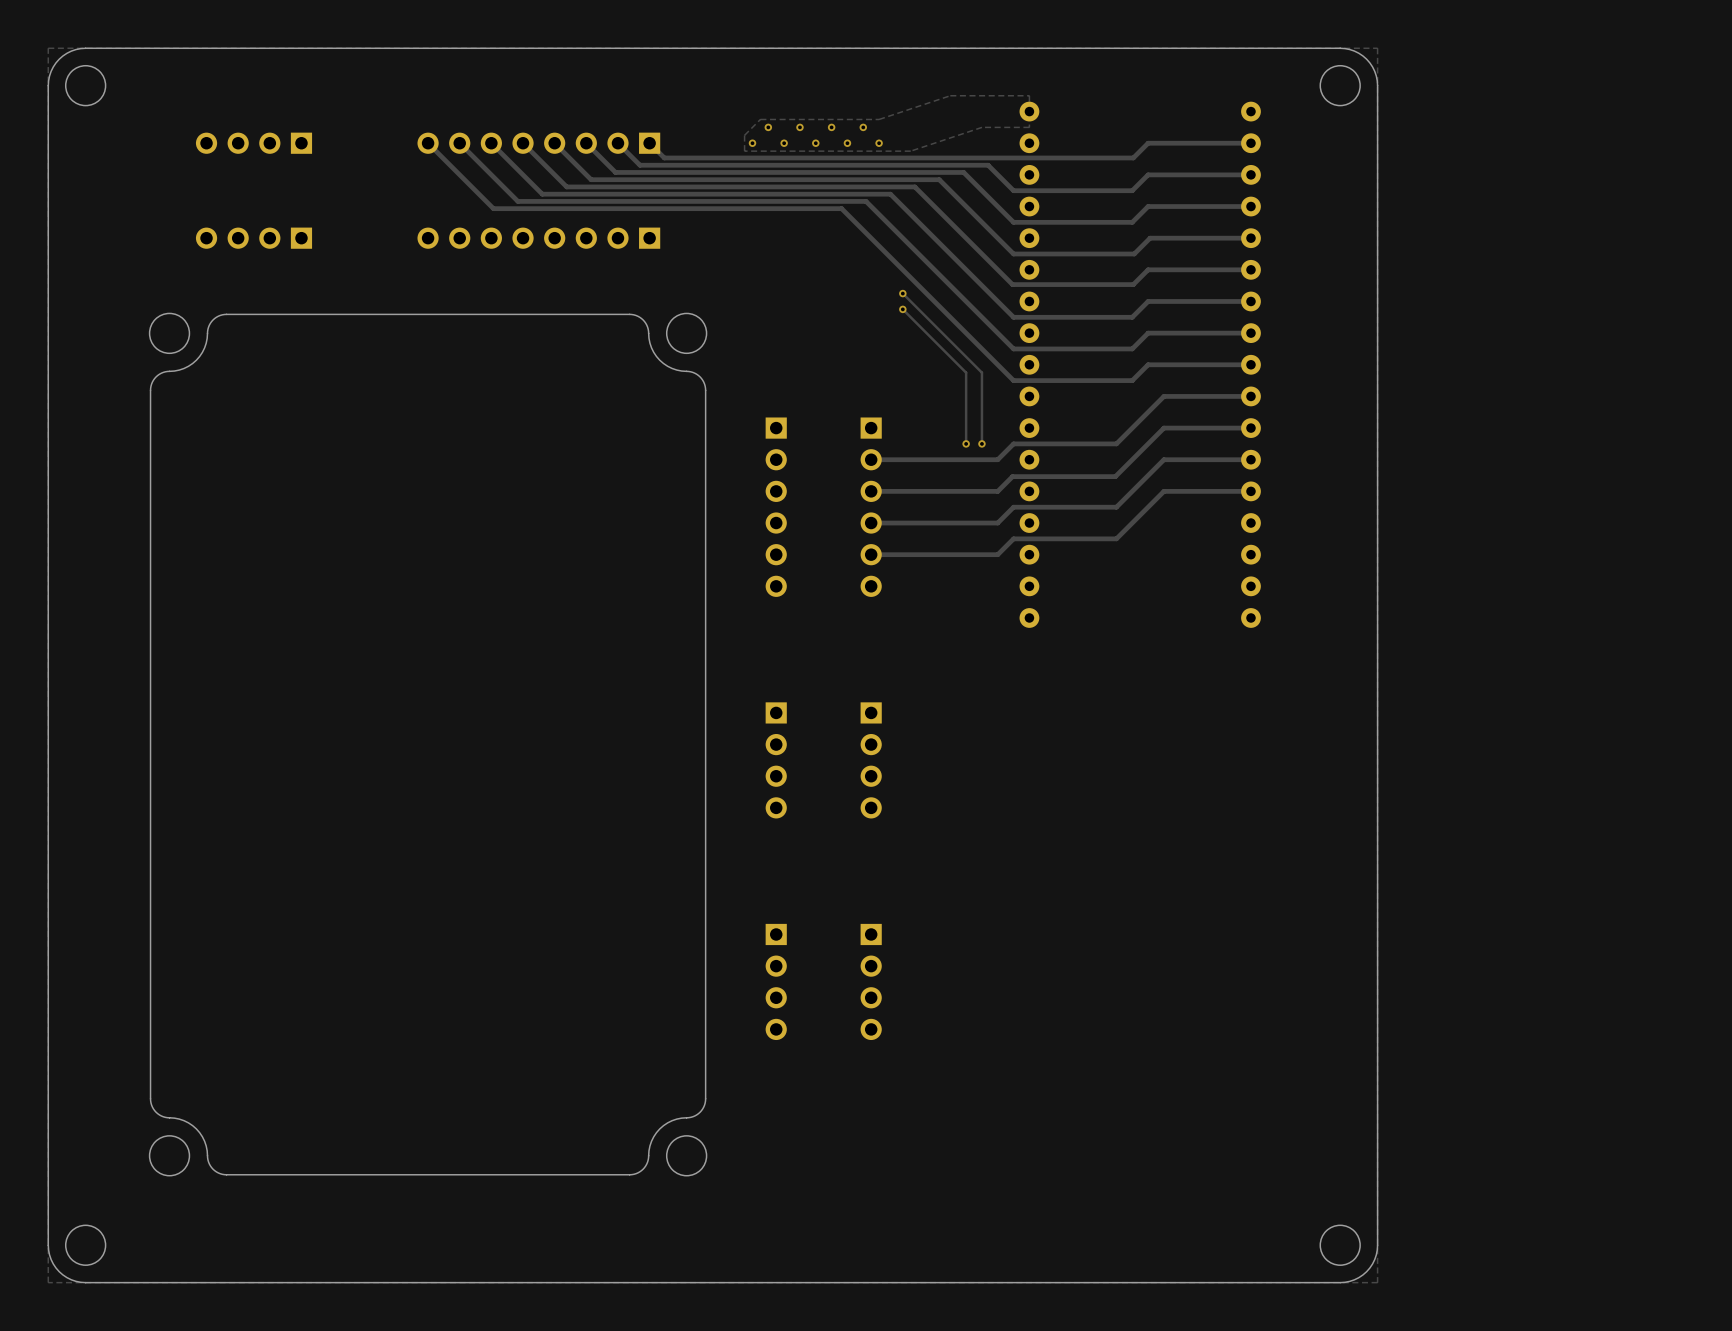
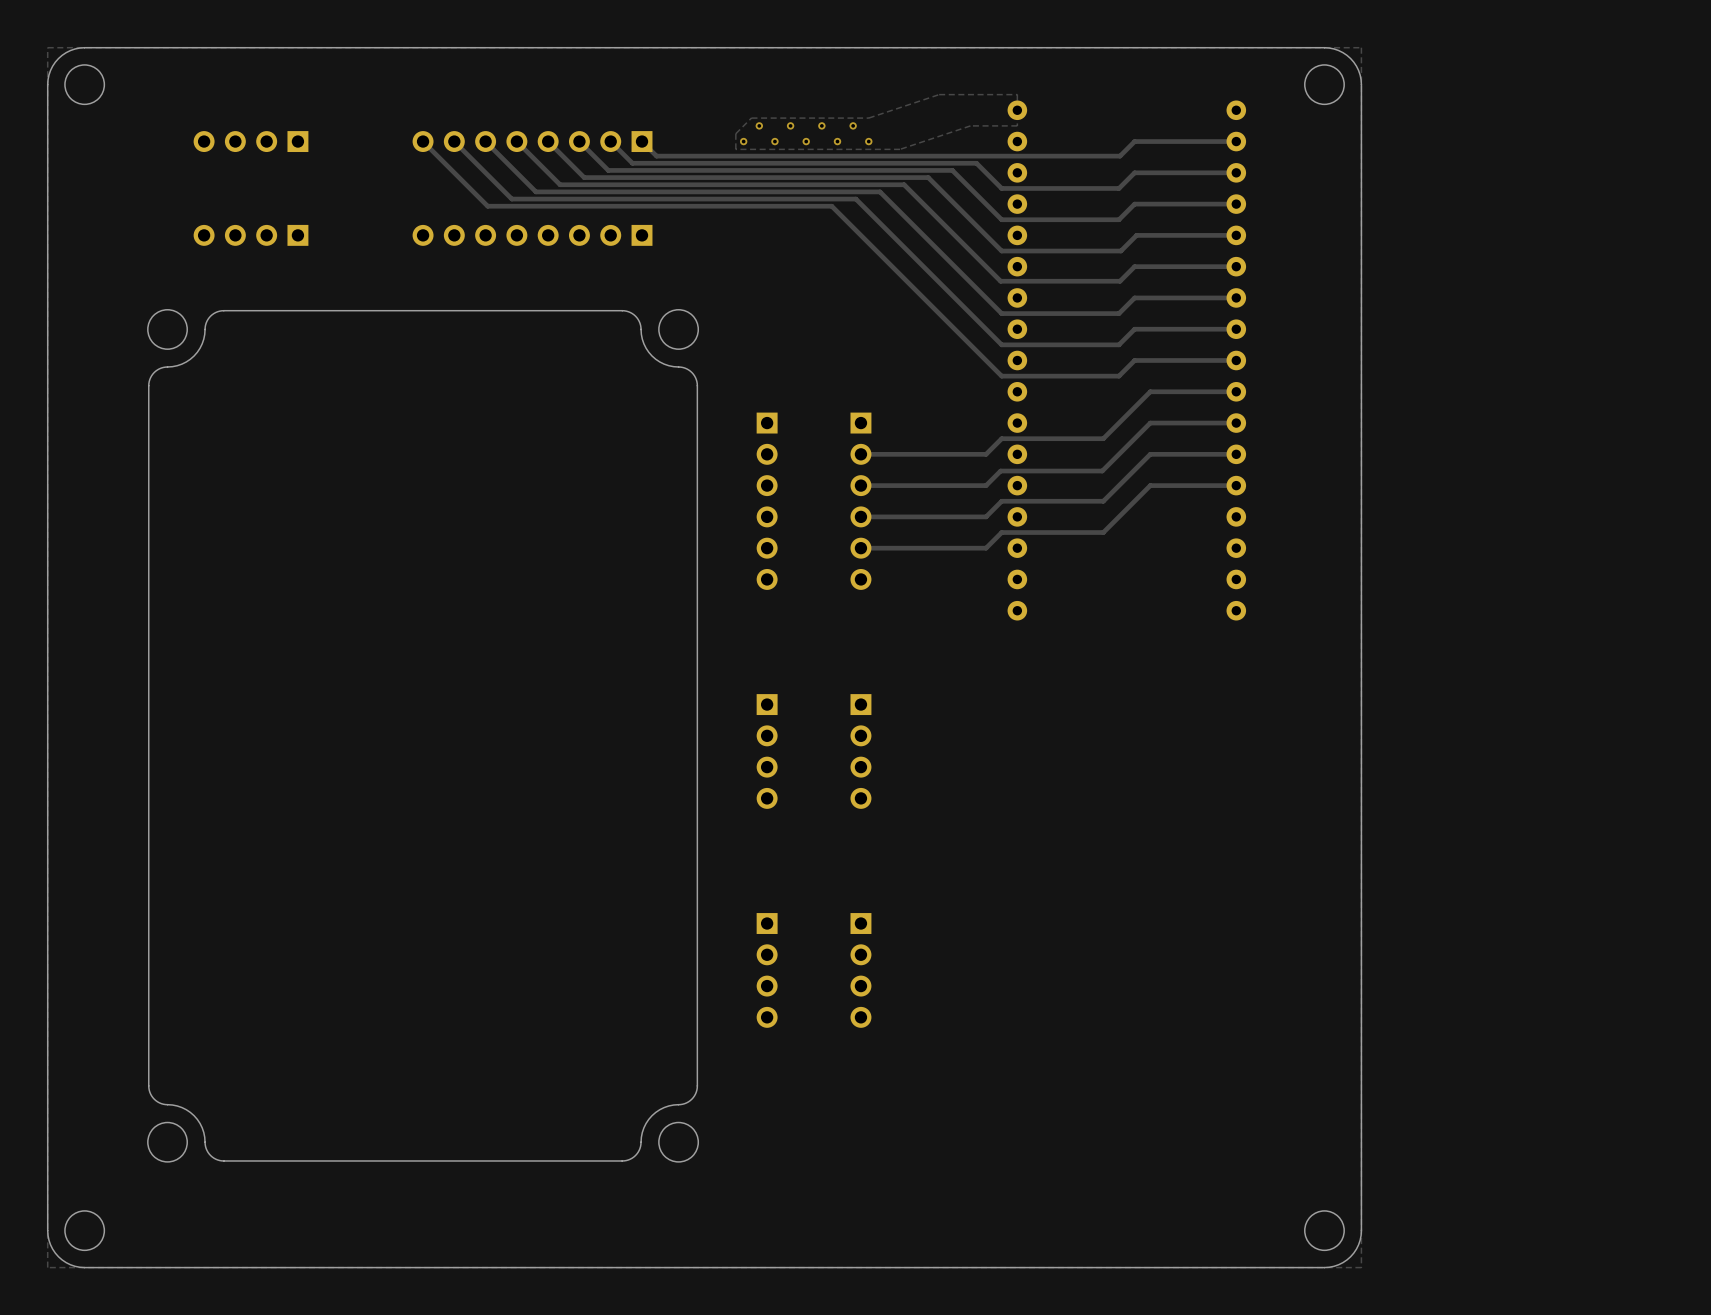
track: (902, 293) (981, 372) (981, 443) -> none
via: (902, 293) -> none
track: (902, 309) (966, 372) (966, 443) -> none
via: (902, 309) -> none
via: (966, 443) -> none
via: (981, 443) -> none

